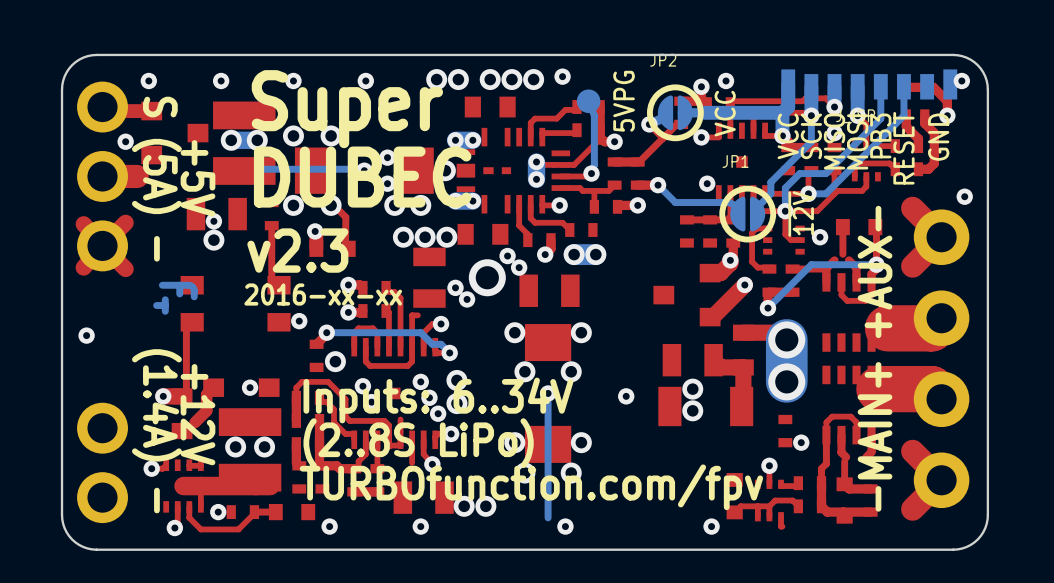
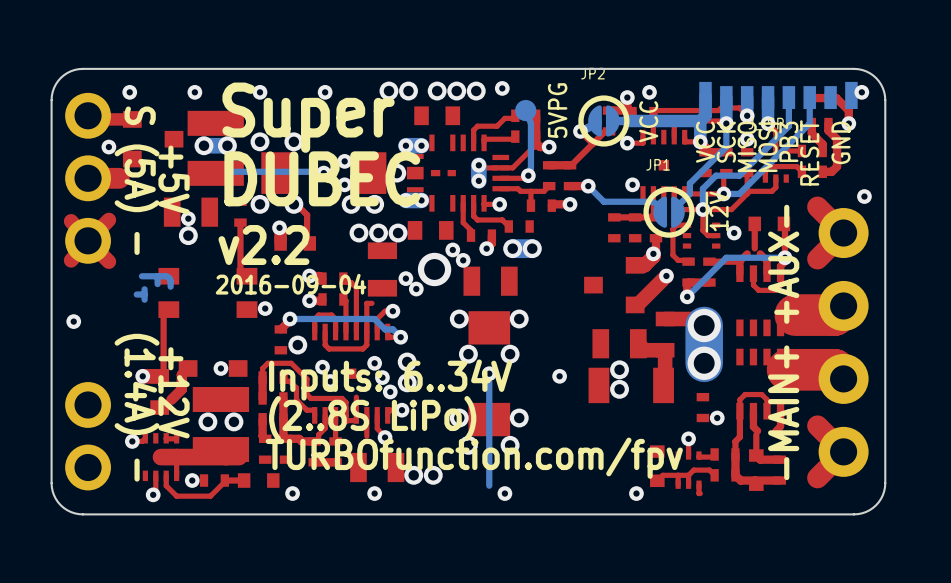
text: v2.3 (297, 250) -> v2.2 (263, 245)
text: 2016-xx-xx (323, 294) -> 2016-09-04 (291, 284)

